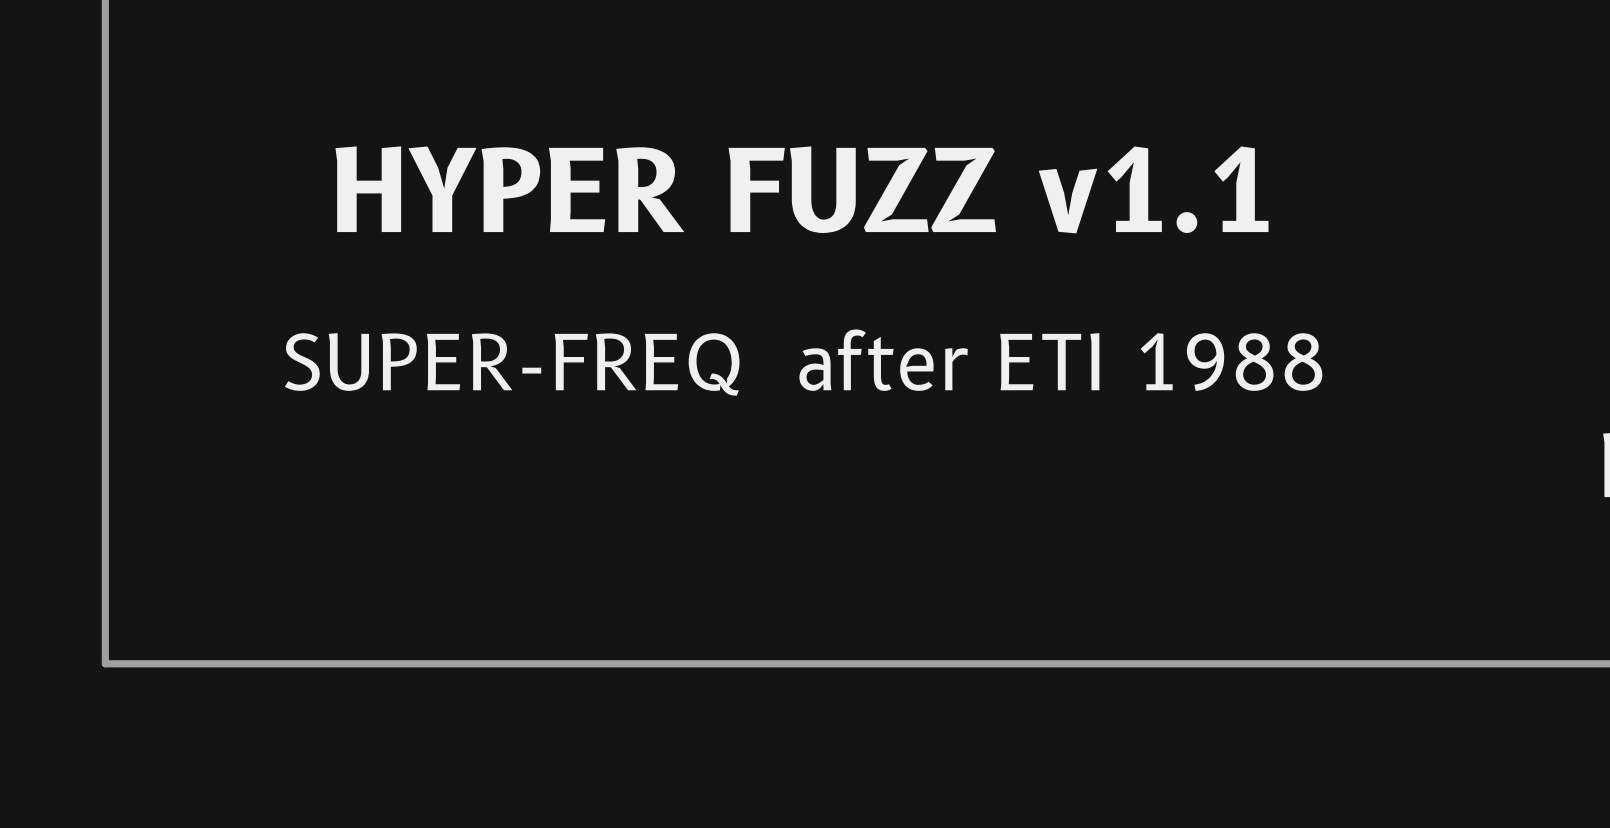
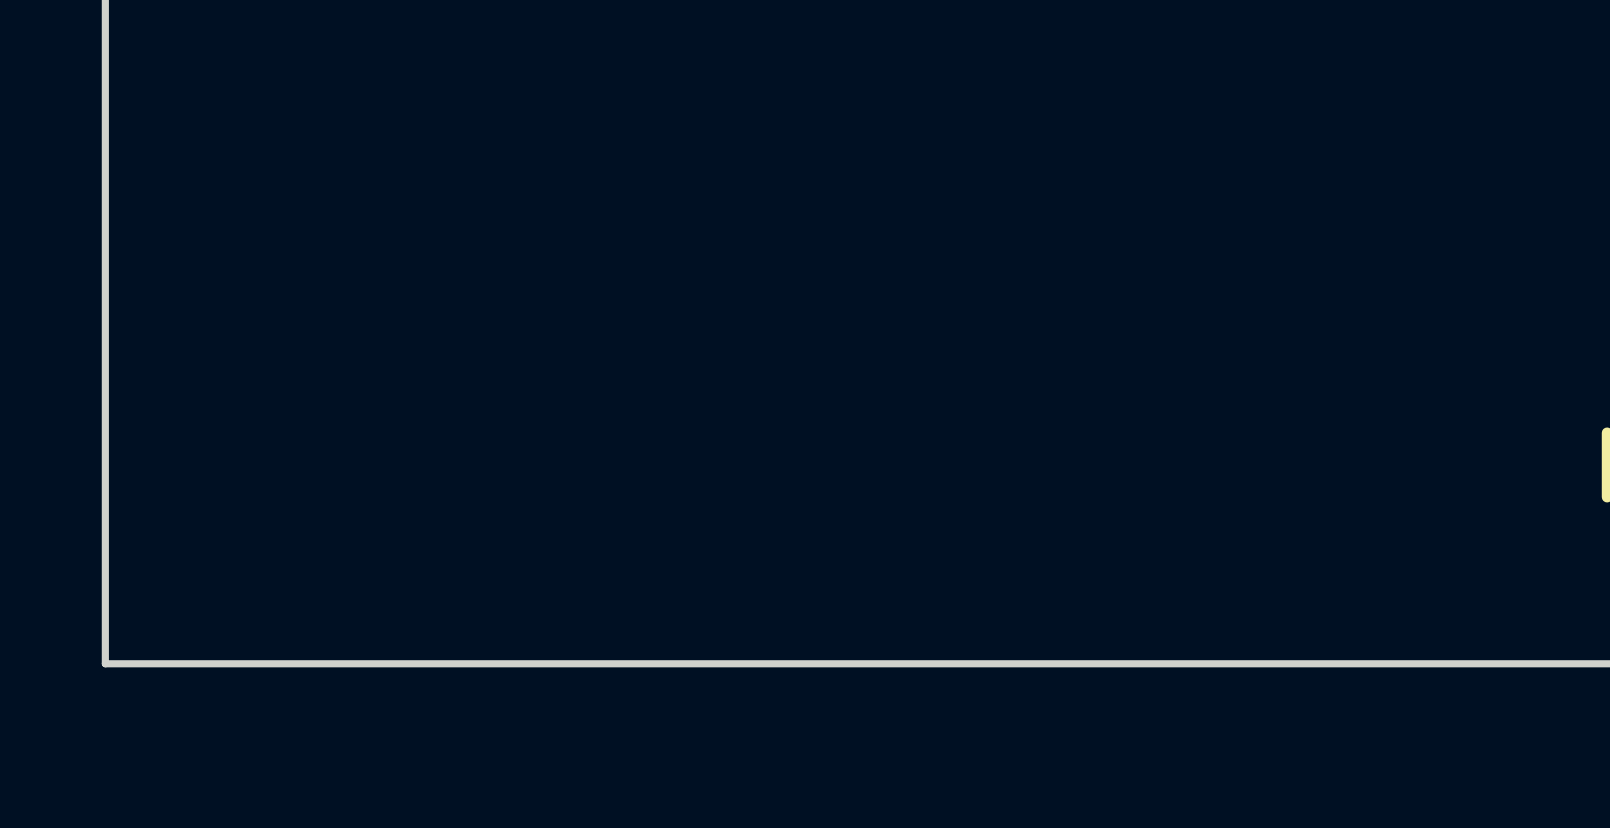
text: HYPER FUZZ v1.1 (801, 189) -> none
text: SUPER-FREQ after ETI 1988 (803, 362) -> none

